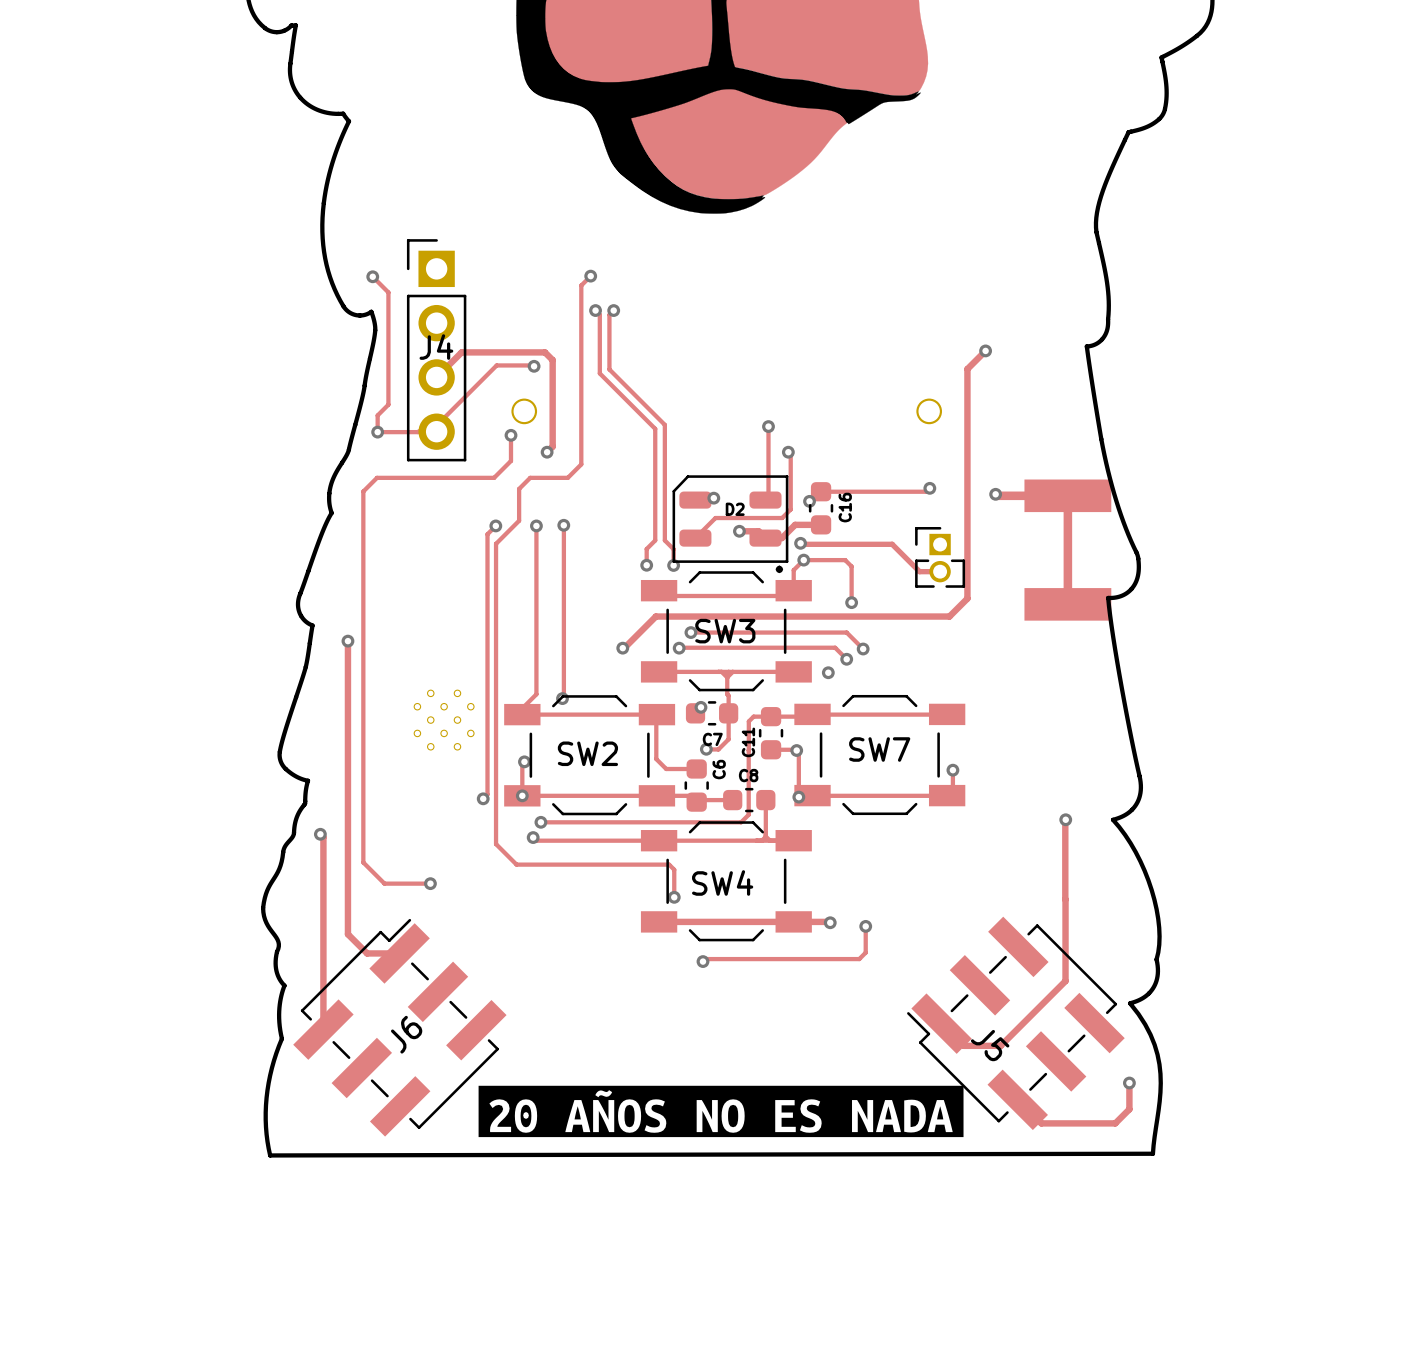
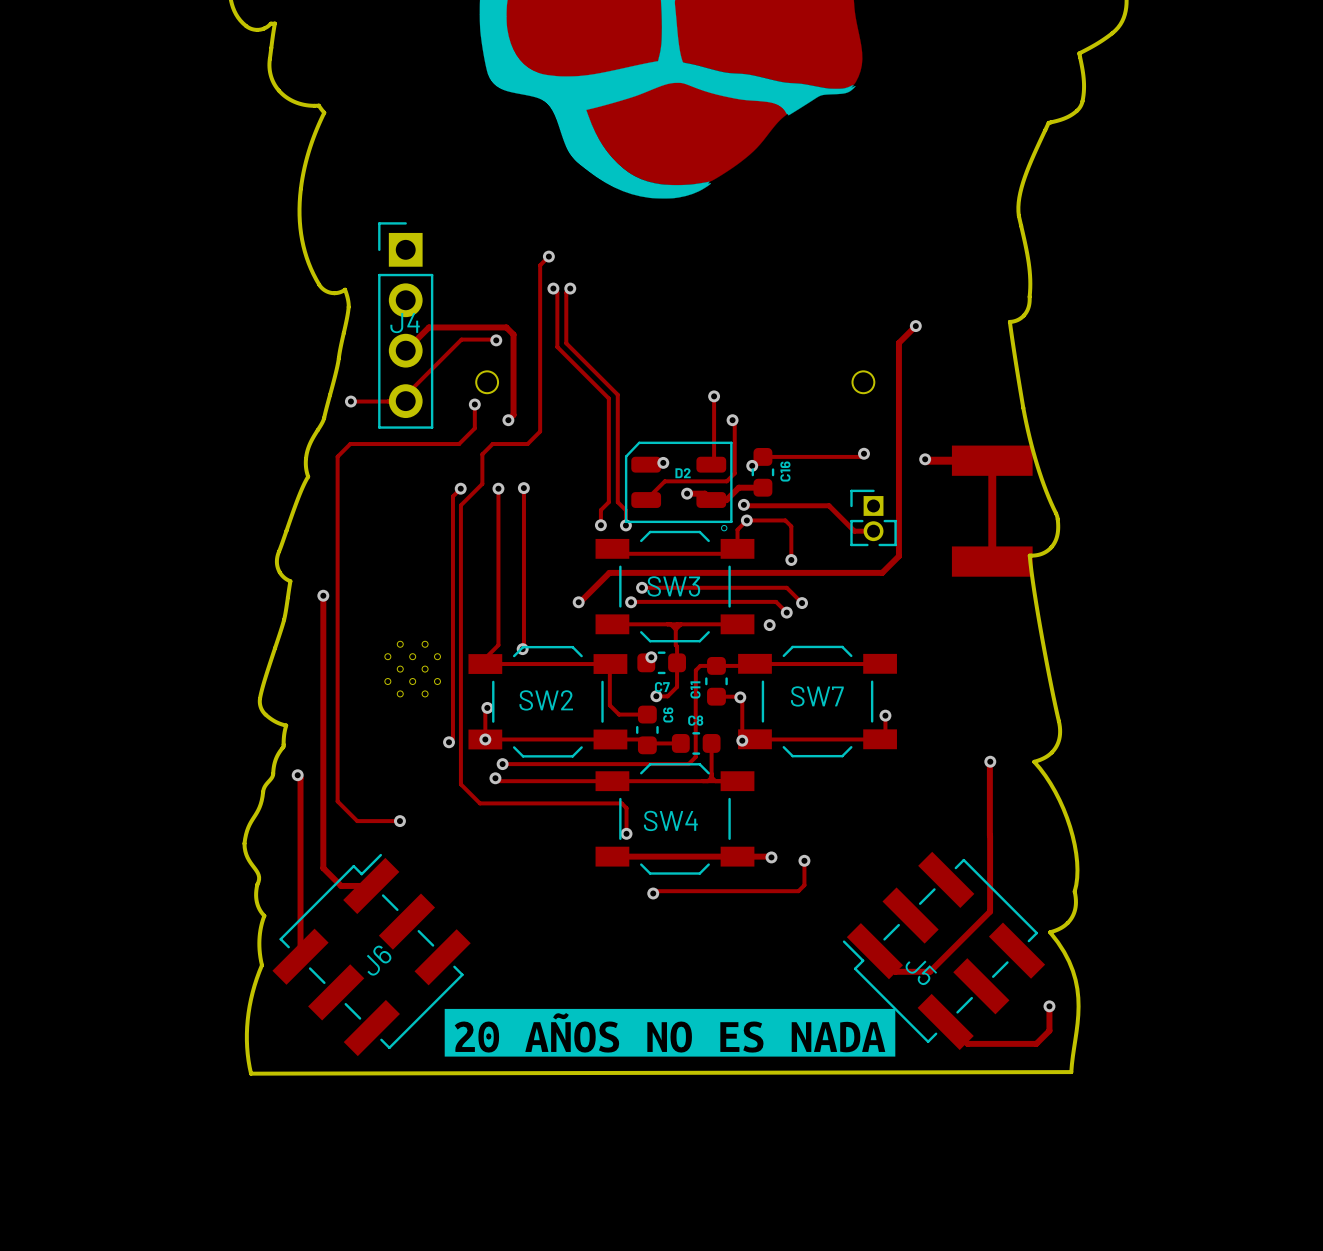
track: (372, 276) (388, 292) (388, 404) (377, 415) (377, 432) -> none
via: (372, 276) -> none

